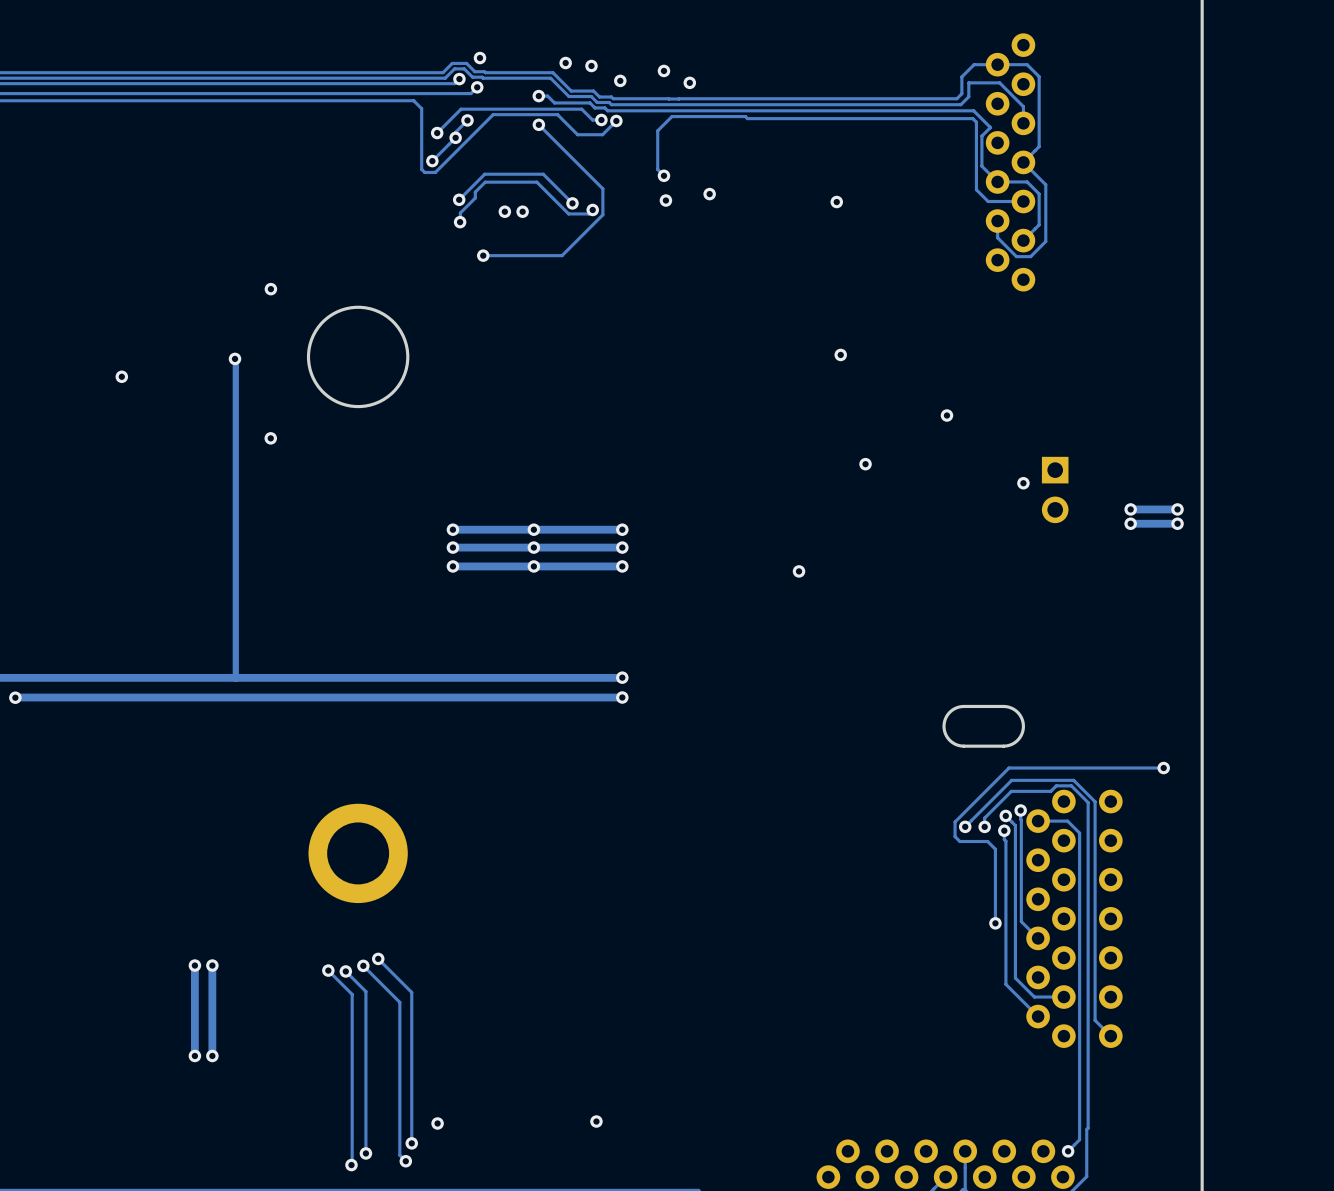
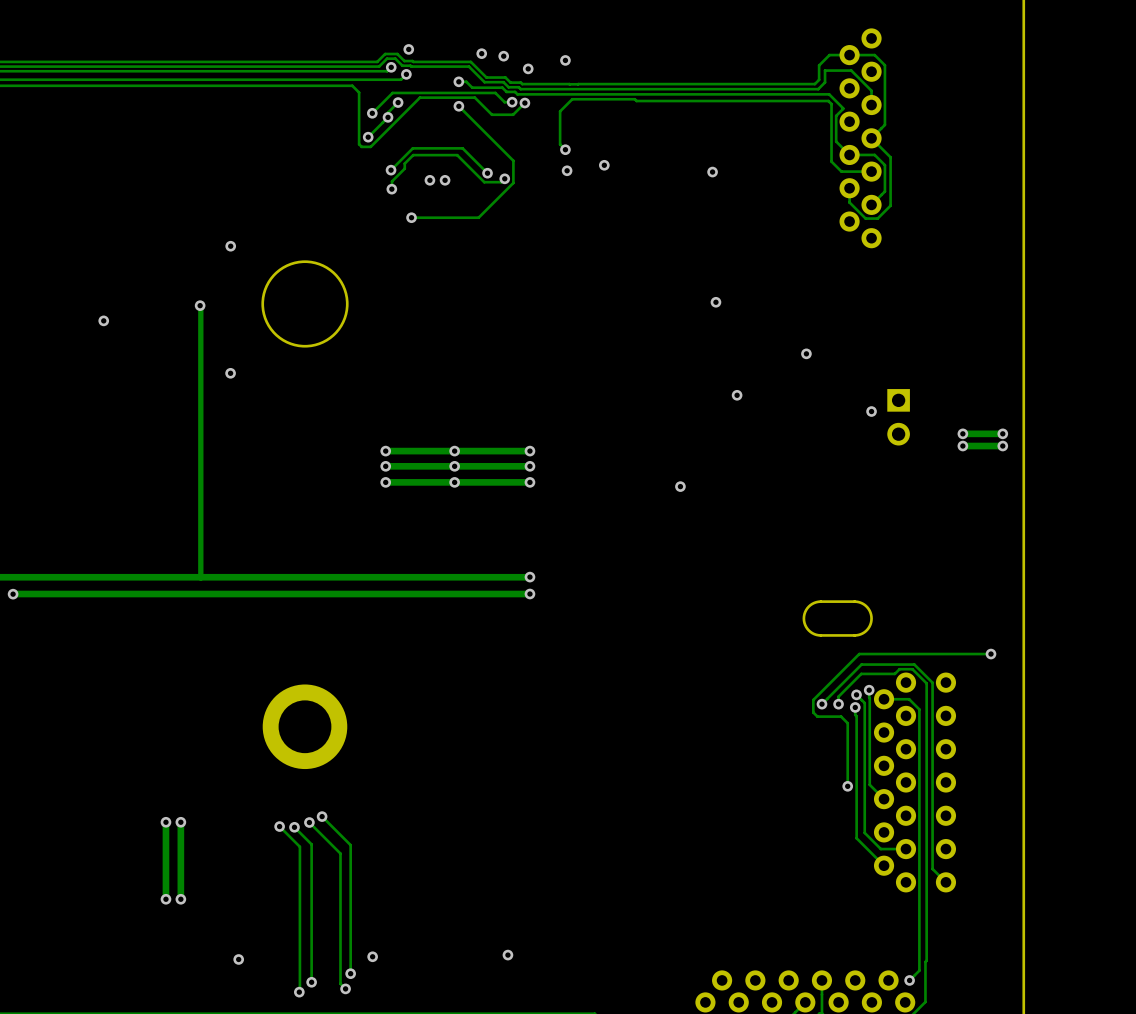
via: (689, 82) -> none
via: none -> (238, 959)

